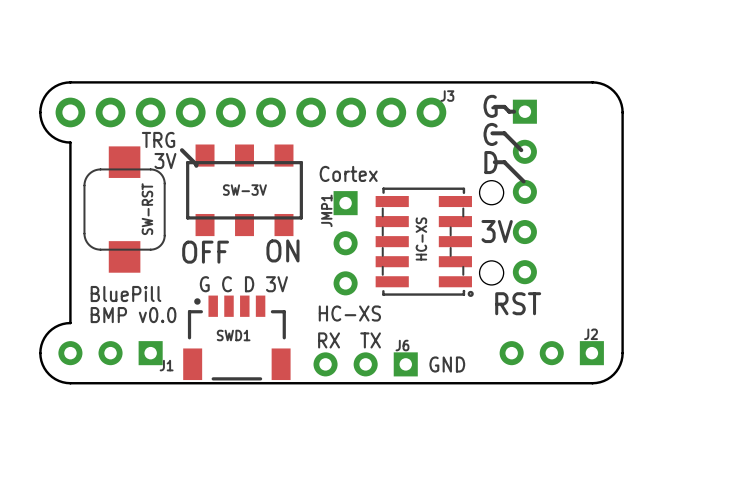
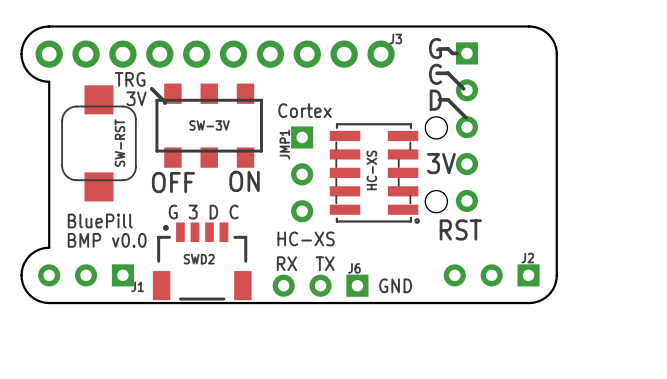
text: G C D 3V (243, 284) -> G 3 D C (203, 212)
SWD1 name: SWD1 (233, 335) -> SWD2 (199, 259)

